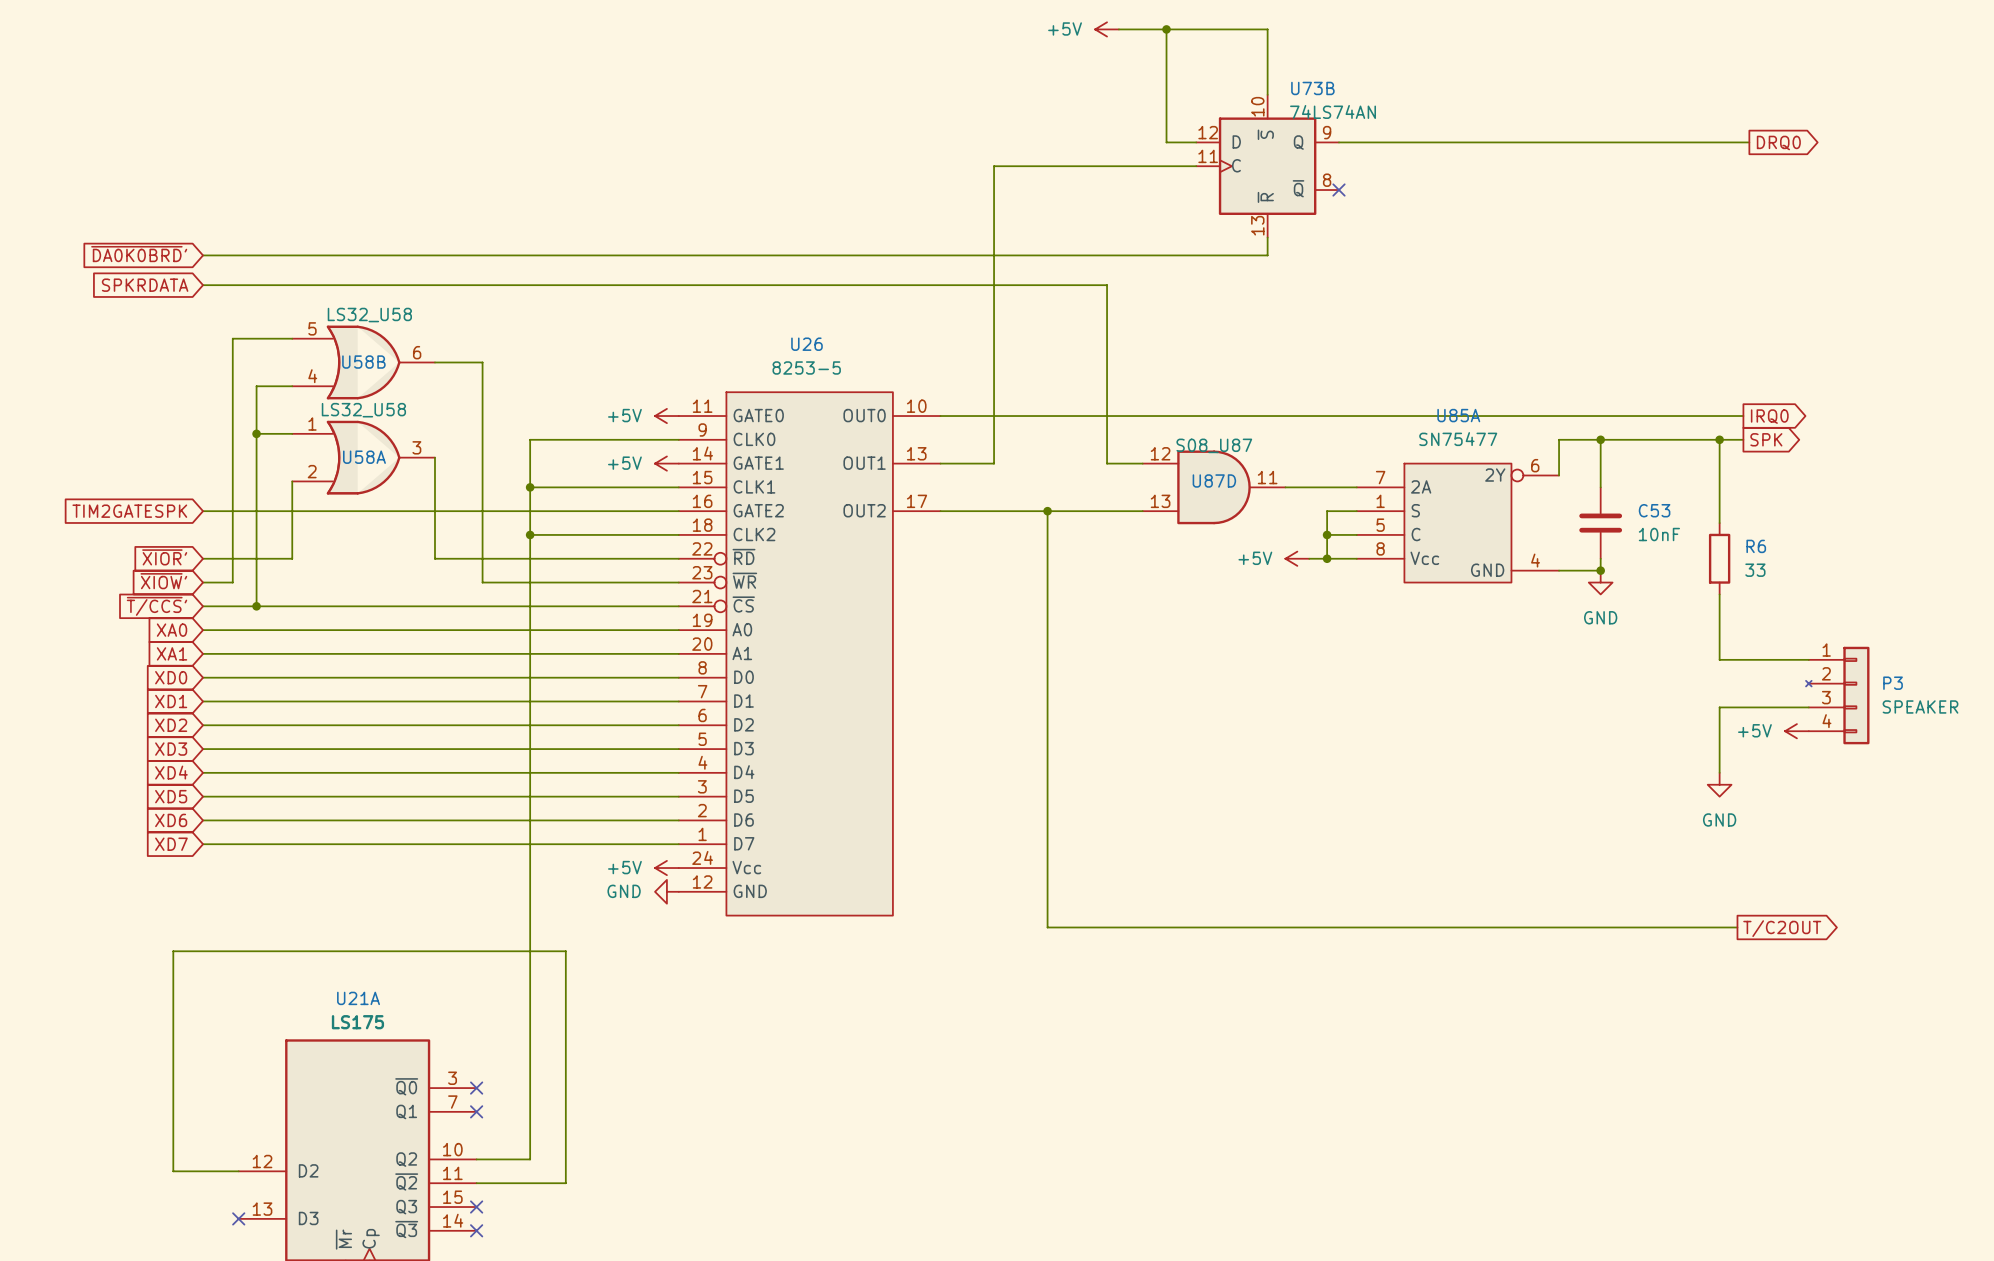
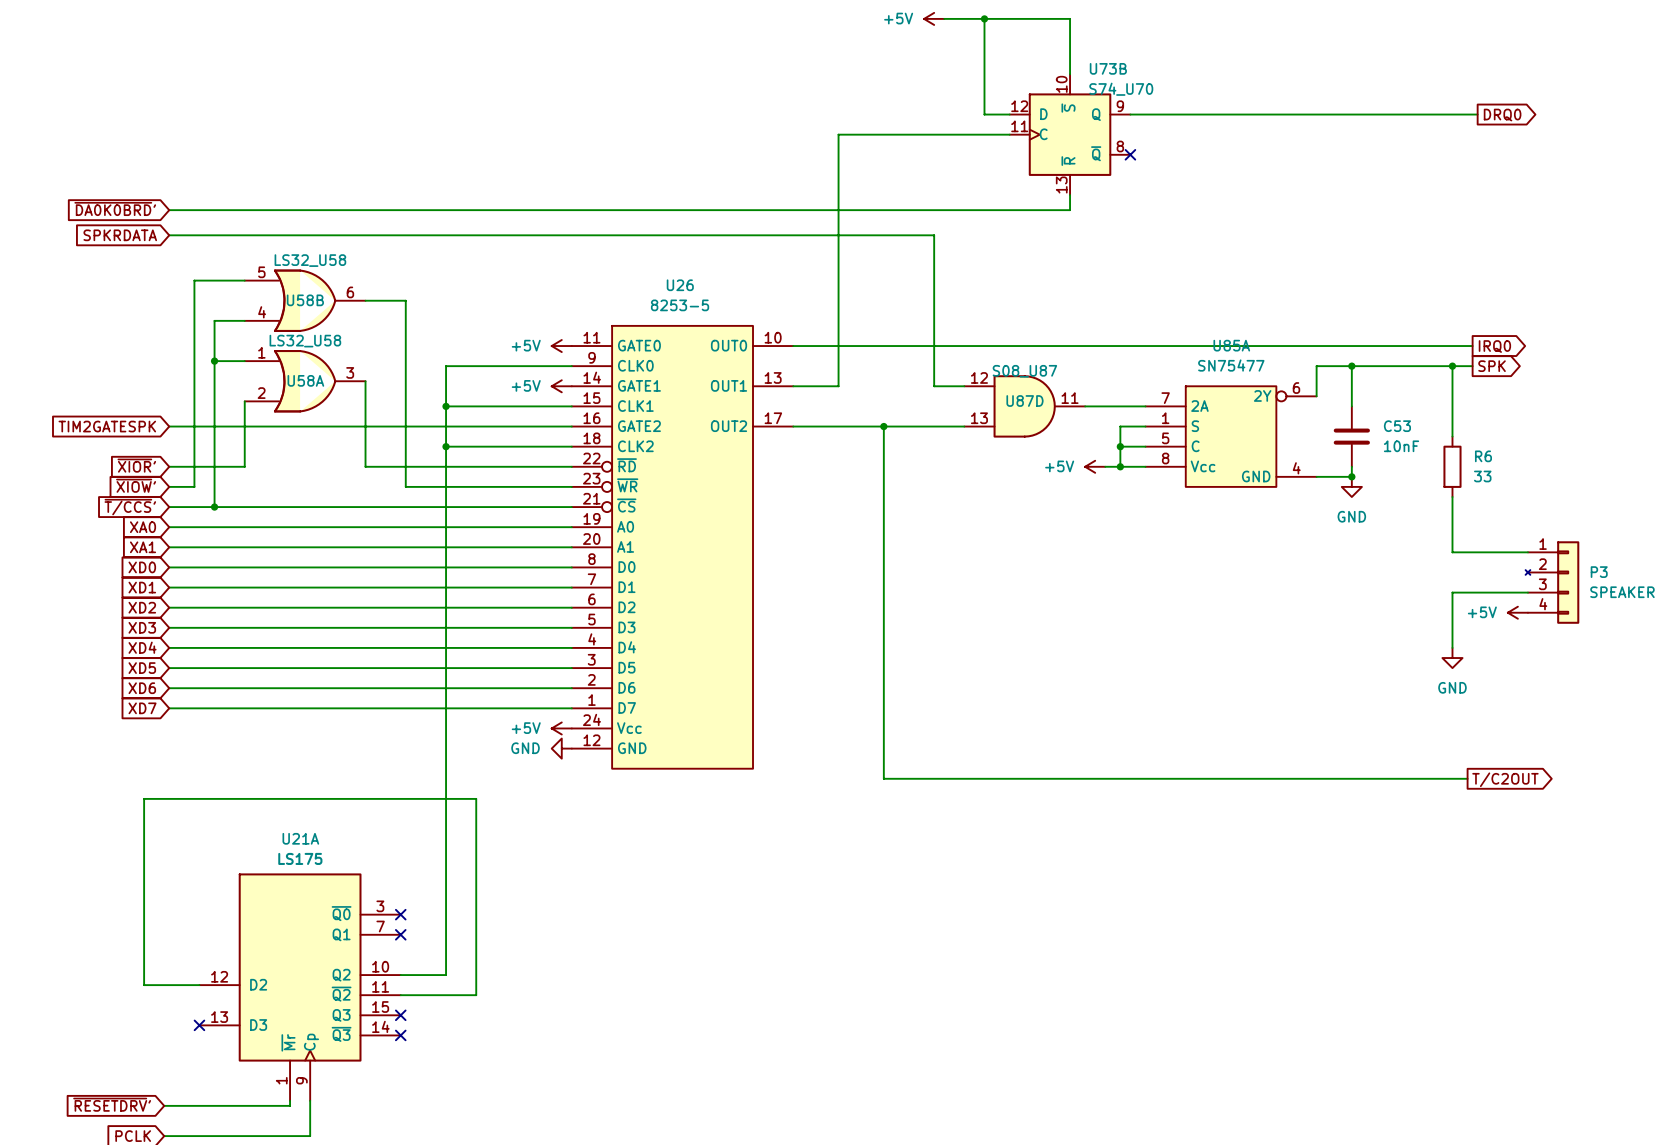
U73B value: 74LS74AN (1333, 111) -> S74_U70 (1121, 89)

